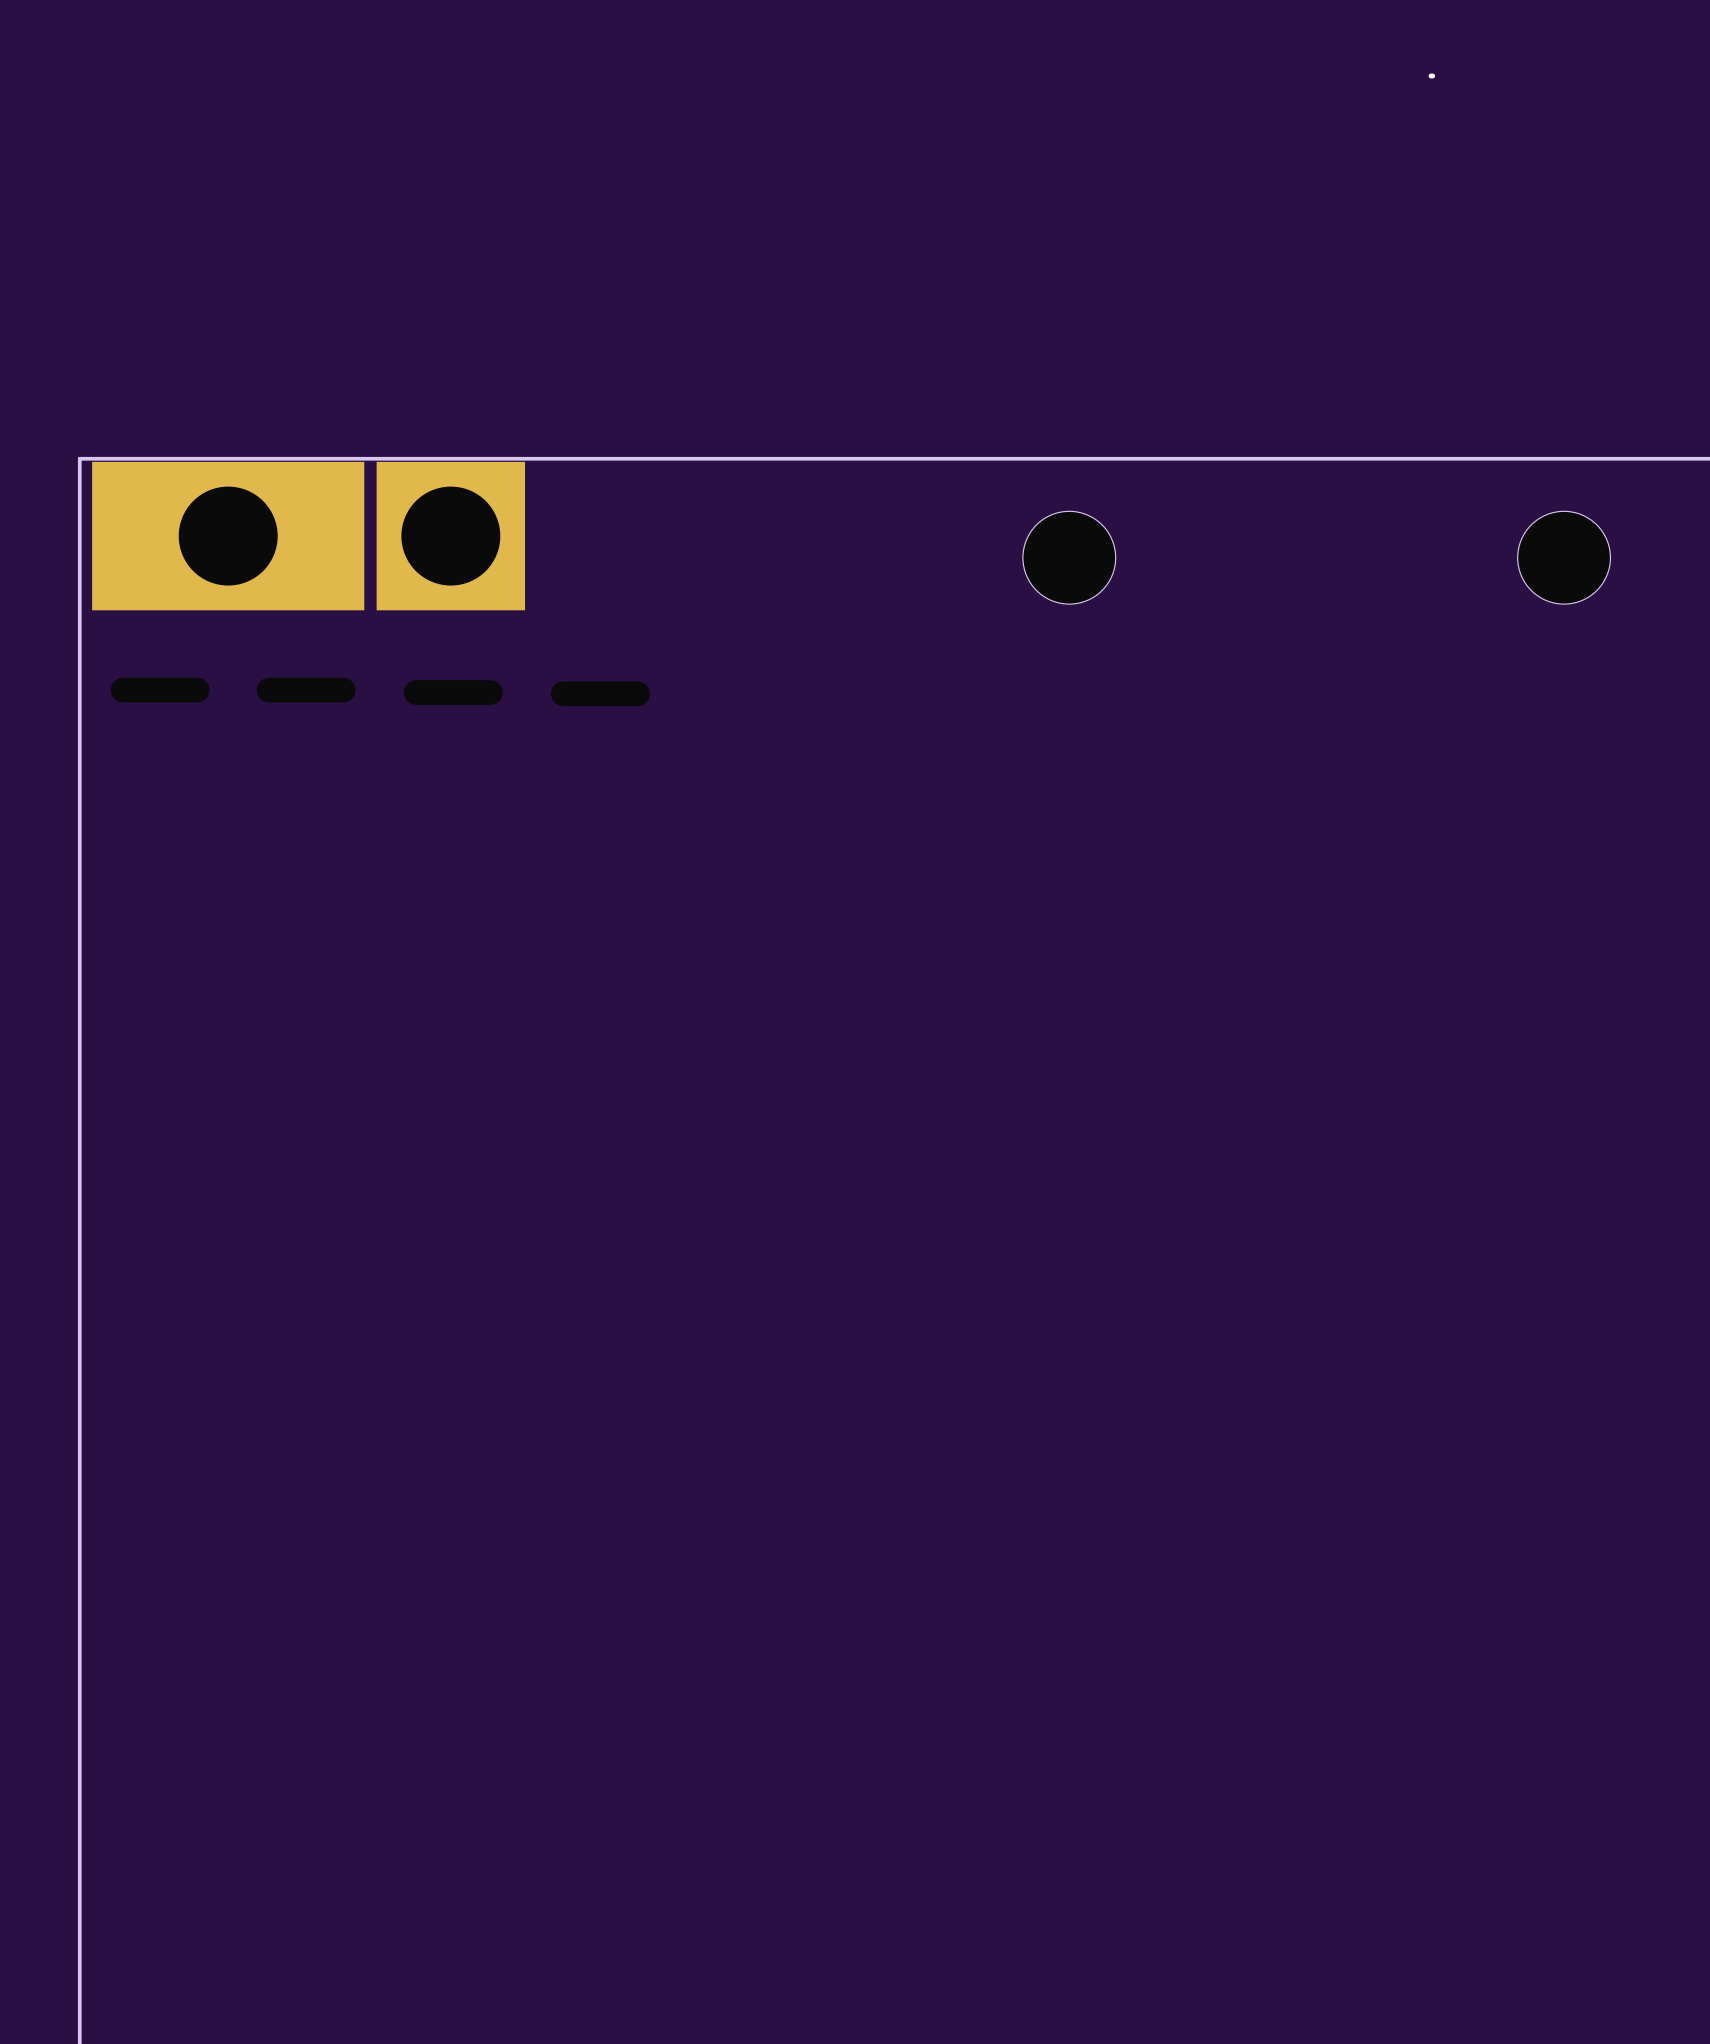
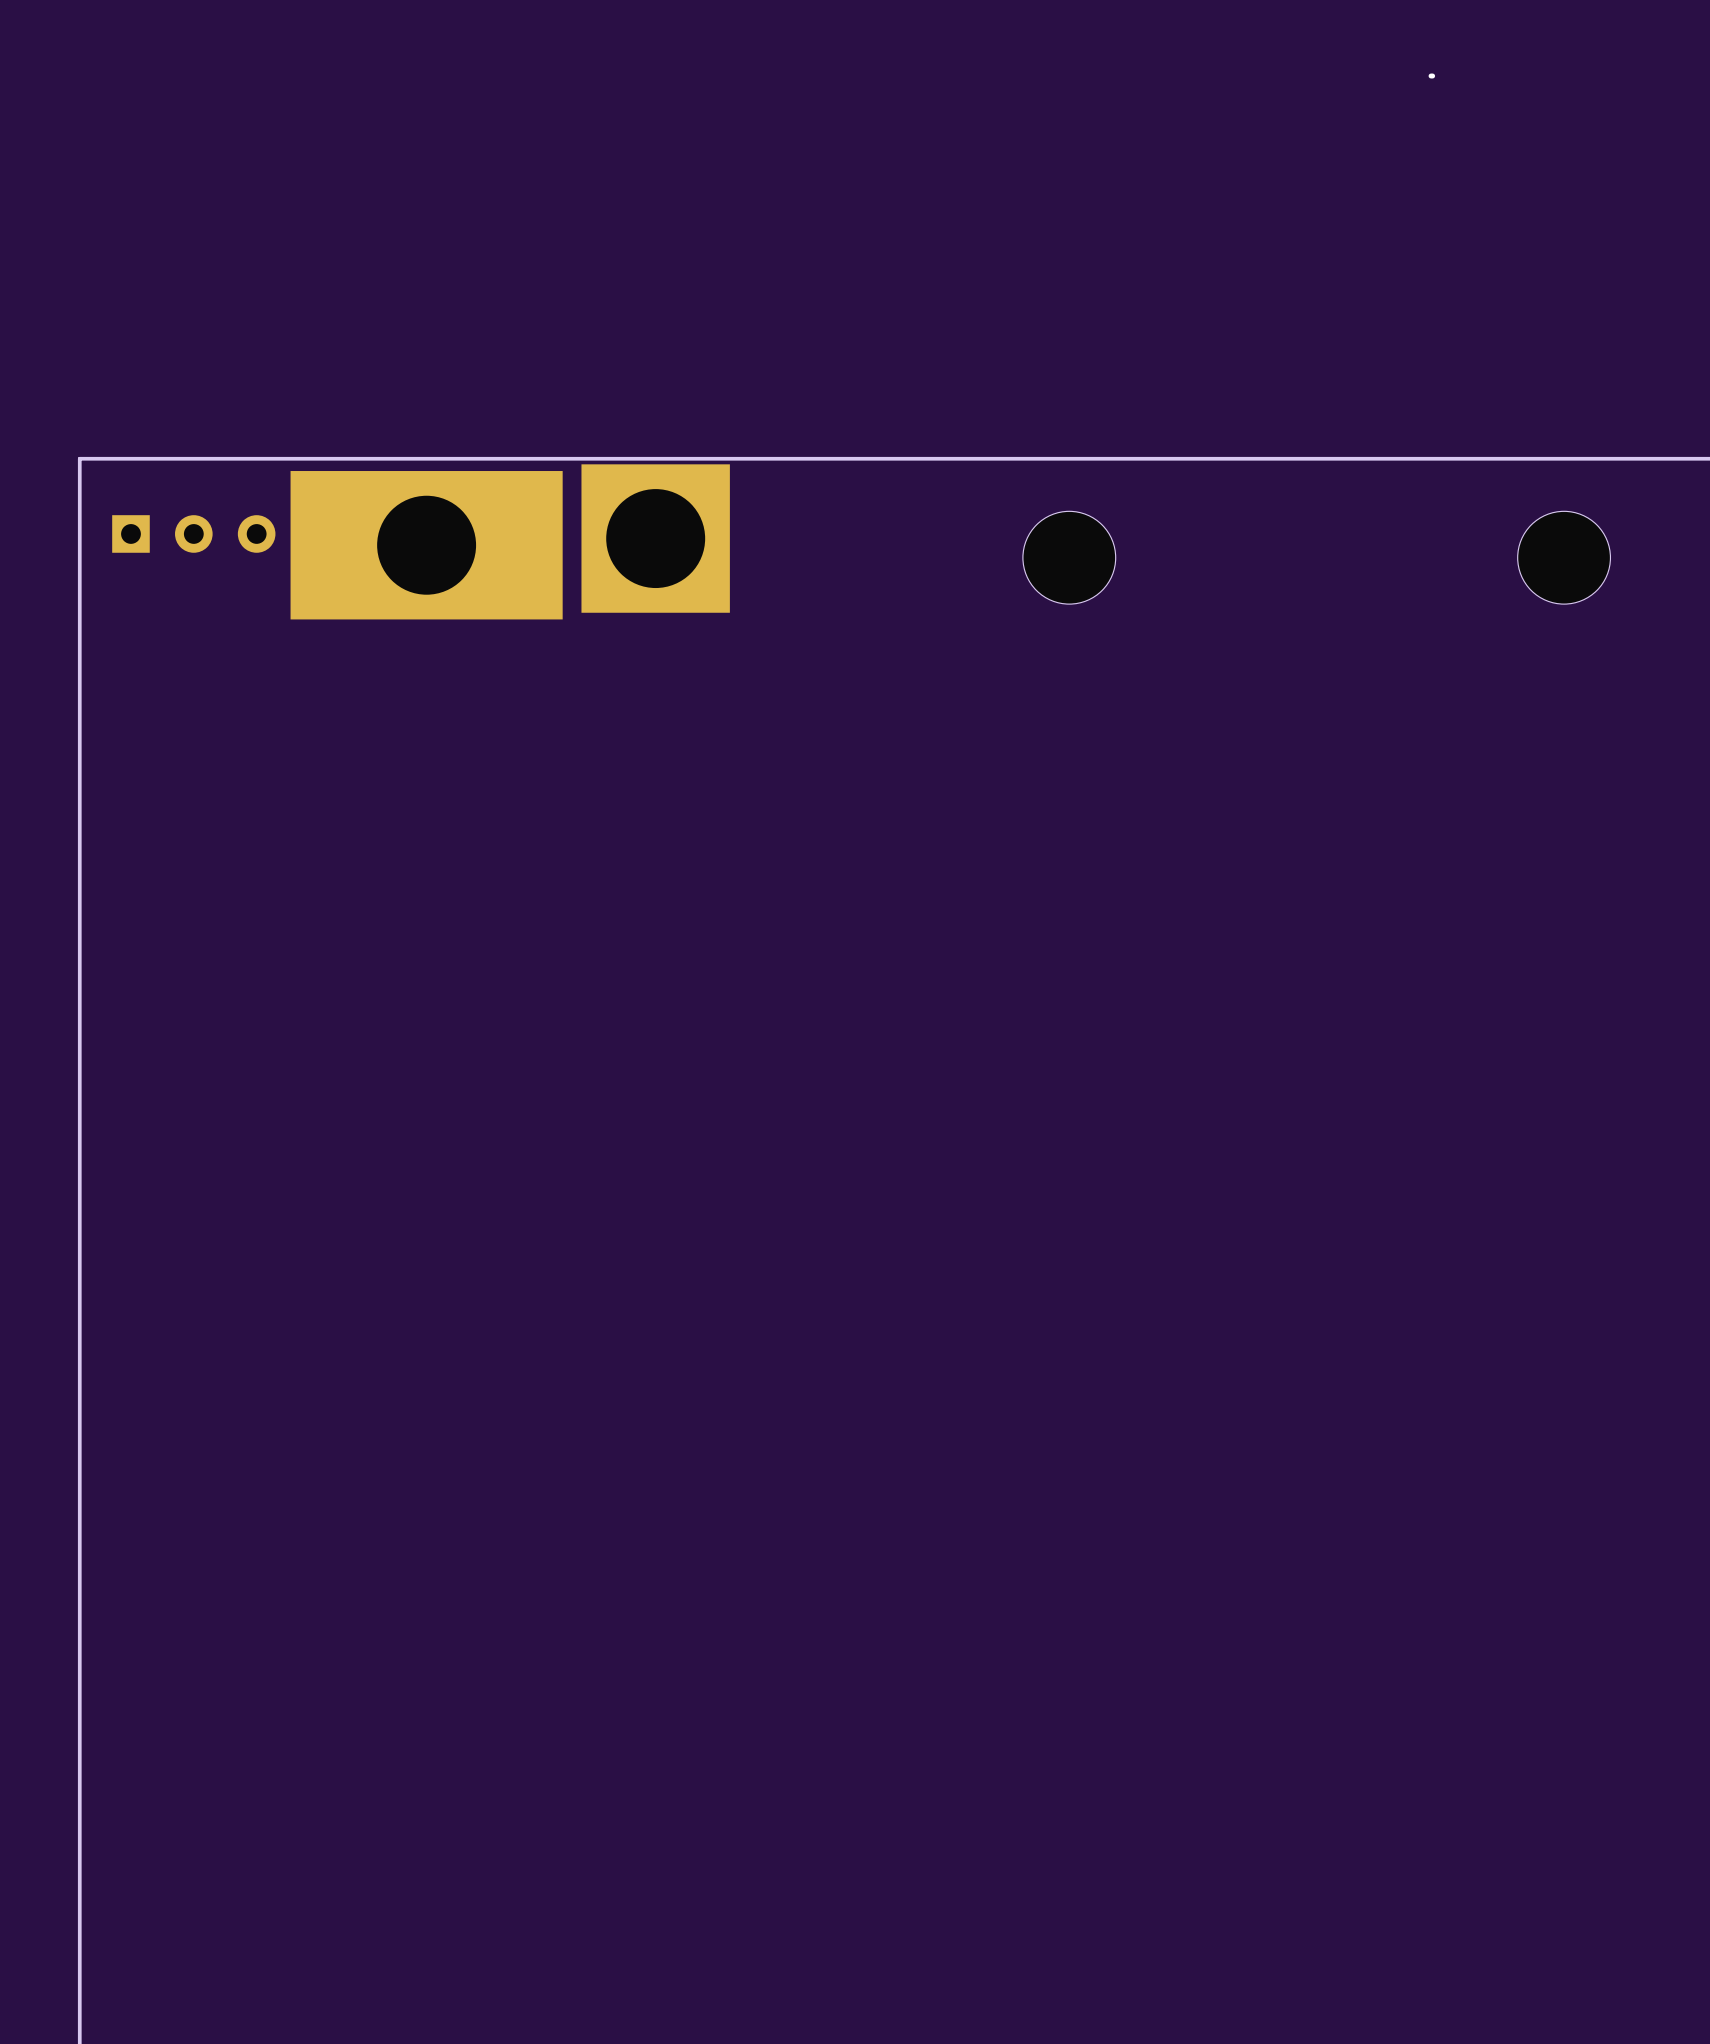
part: none -> (193, 533)
part position: (228, 536) -> (426, 545)
part position: (450, 536) -> (655, 538)
part: (160, 690) -> none
part: (306, 690) -> none
part: (453, 692) -> none
part: (600, 693) -> none

